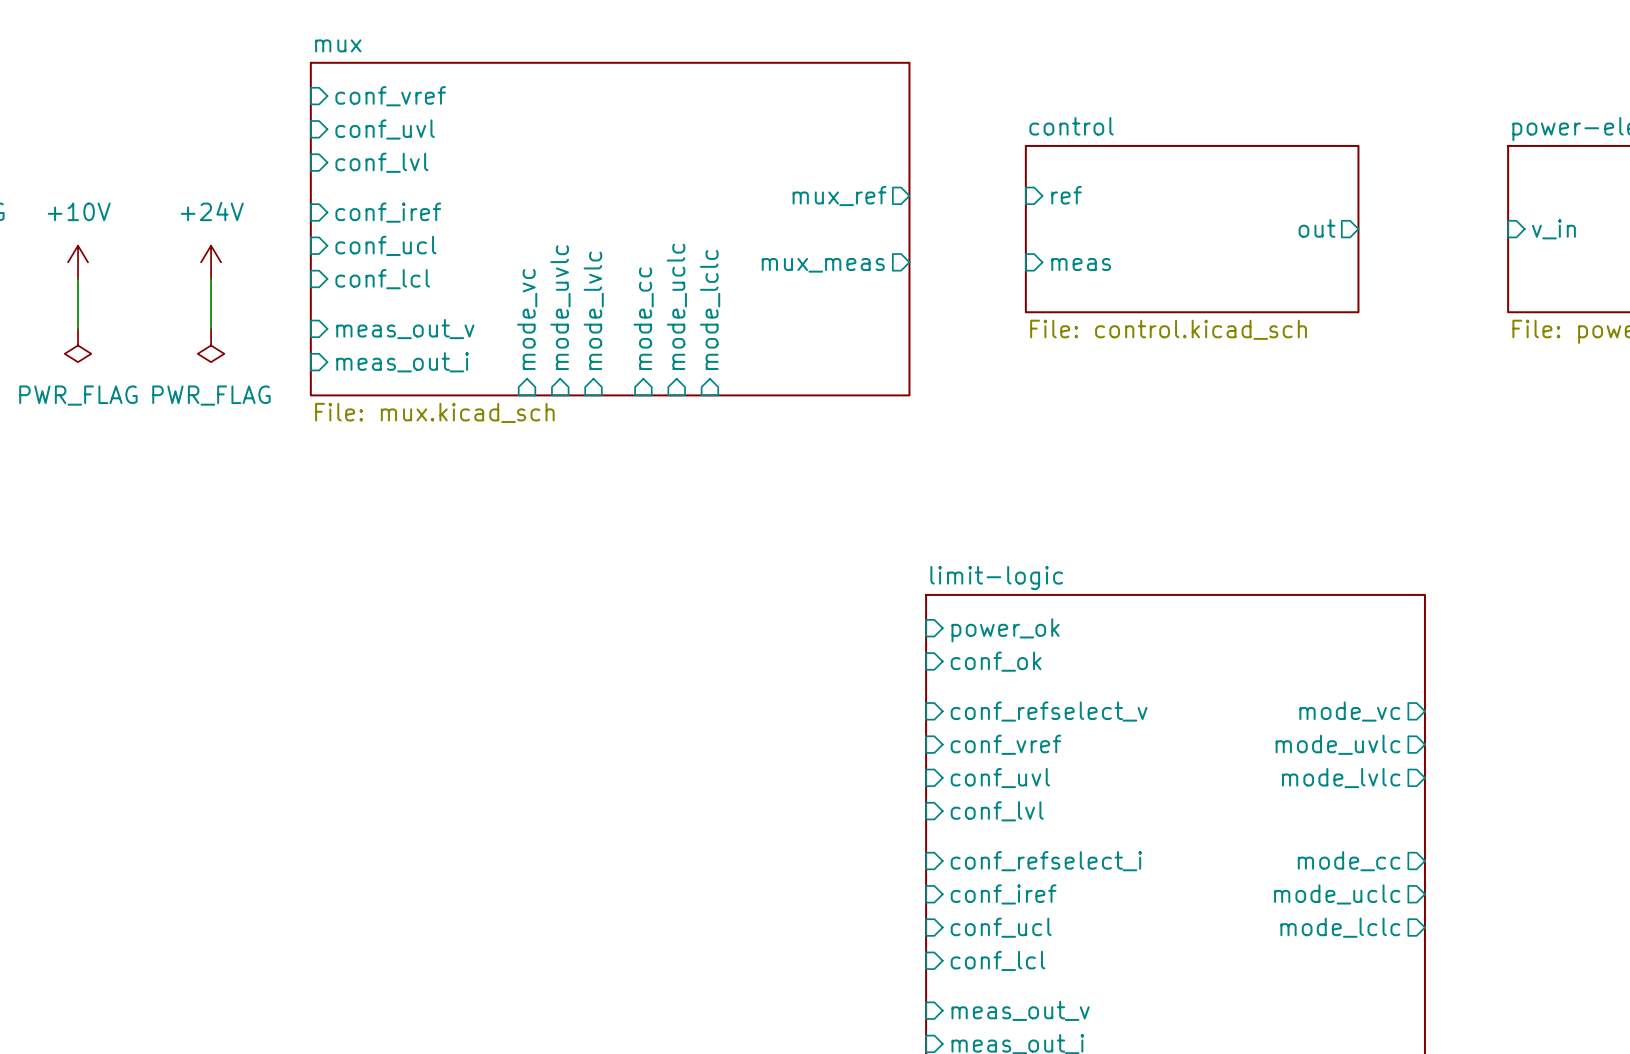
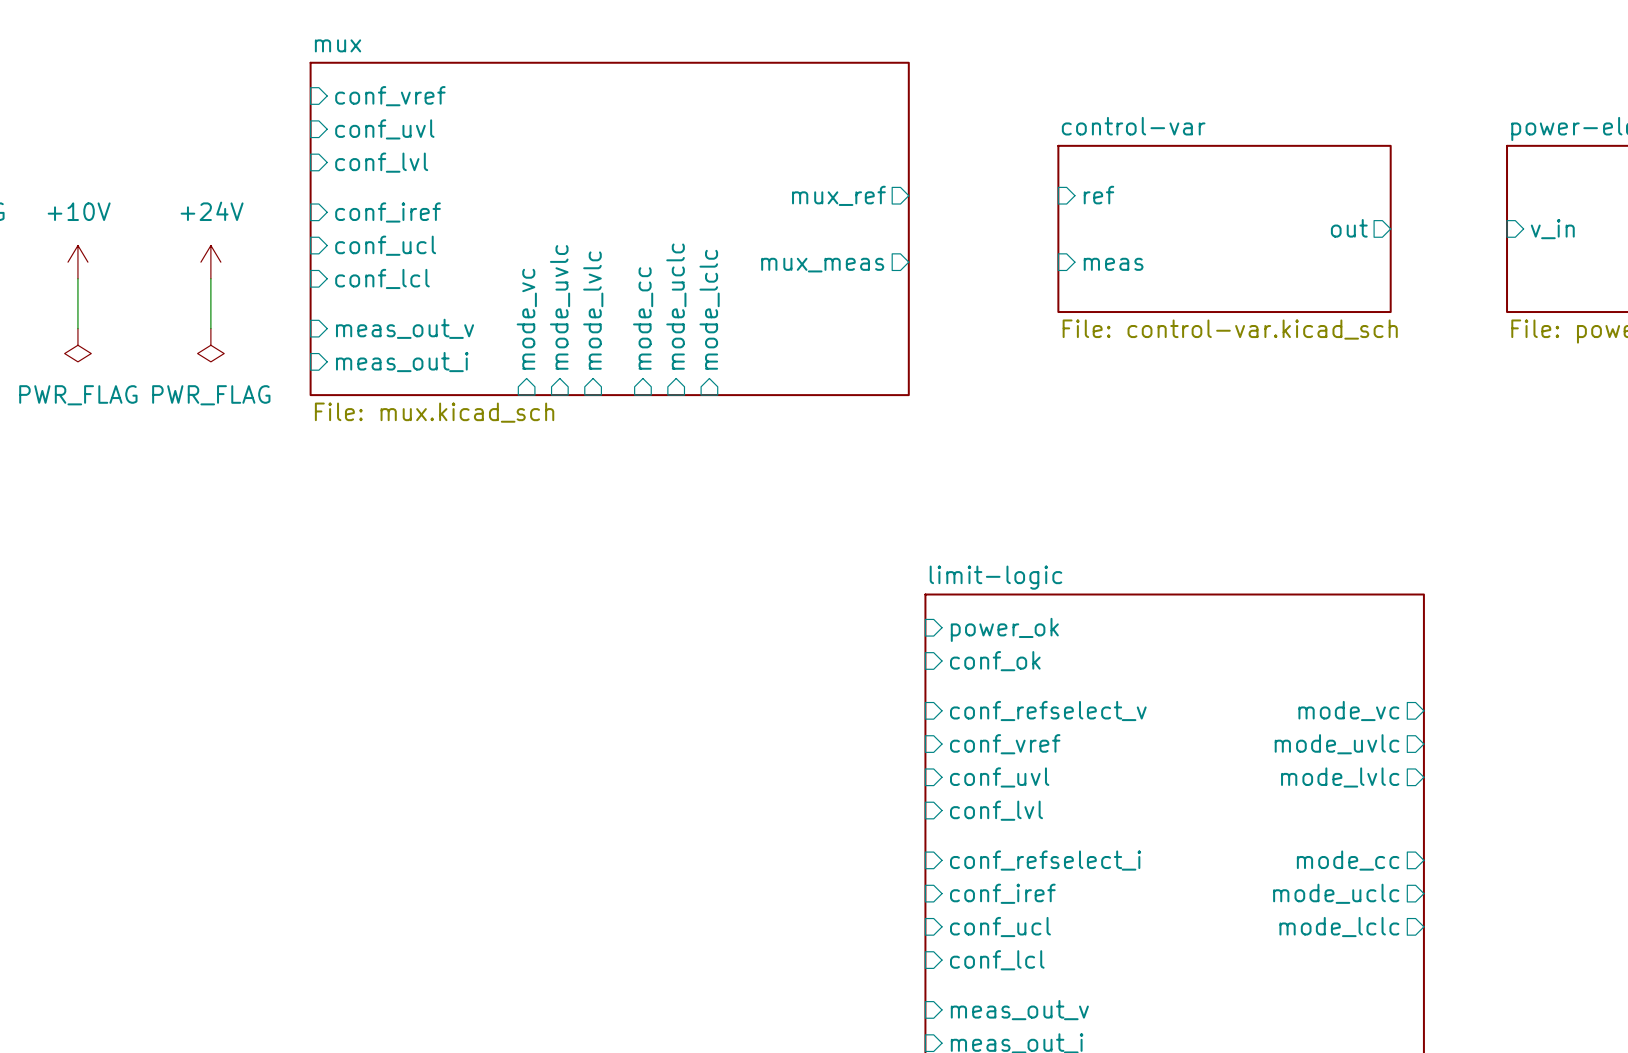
sheet pin position: ref (1066, 195) -> ref (1098, 195)
sheet pin position: out (1317, 228) -> out (1349, 228)
sheet control: File: control.kicad_sch (1192, 229) -> none
sheet control-var: none -> File: control-var.kicad_sch (1224, 228)
sheet pin position: meas (1081, 264) -> meas (1113, 264)

